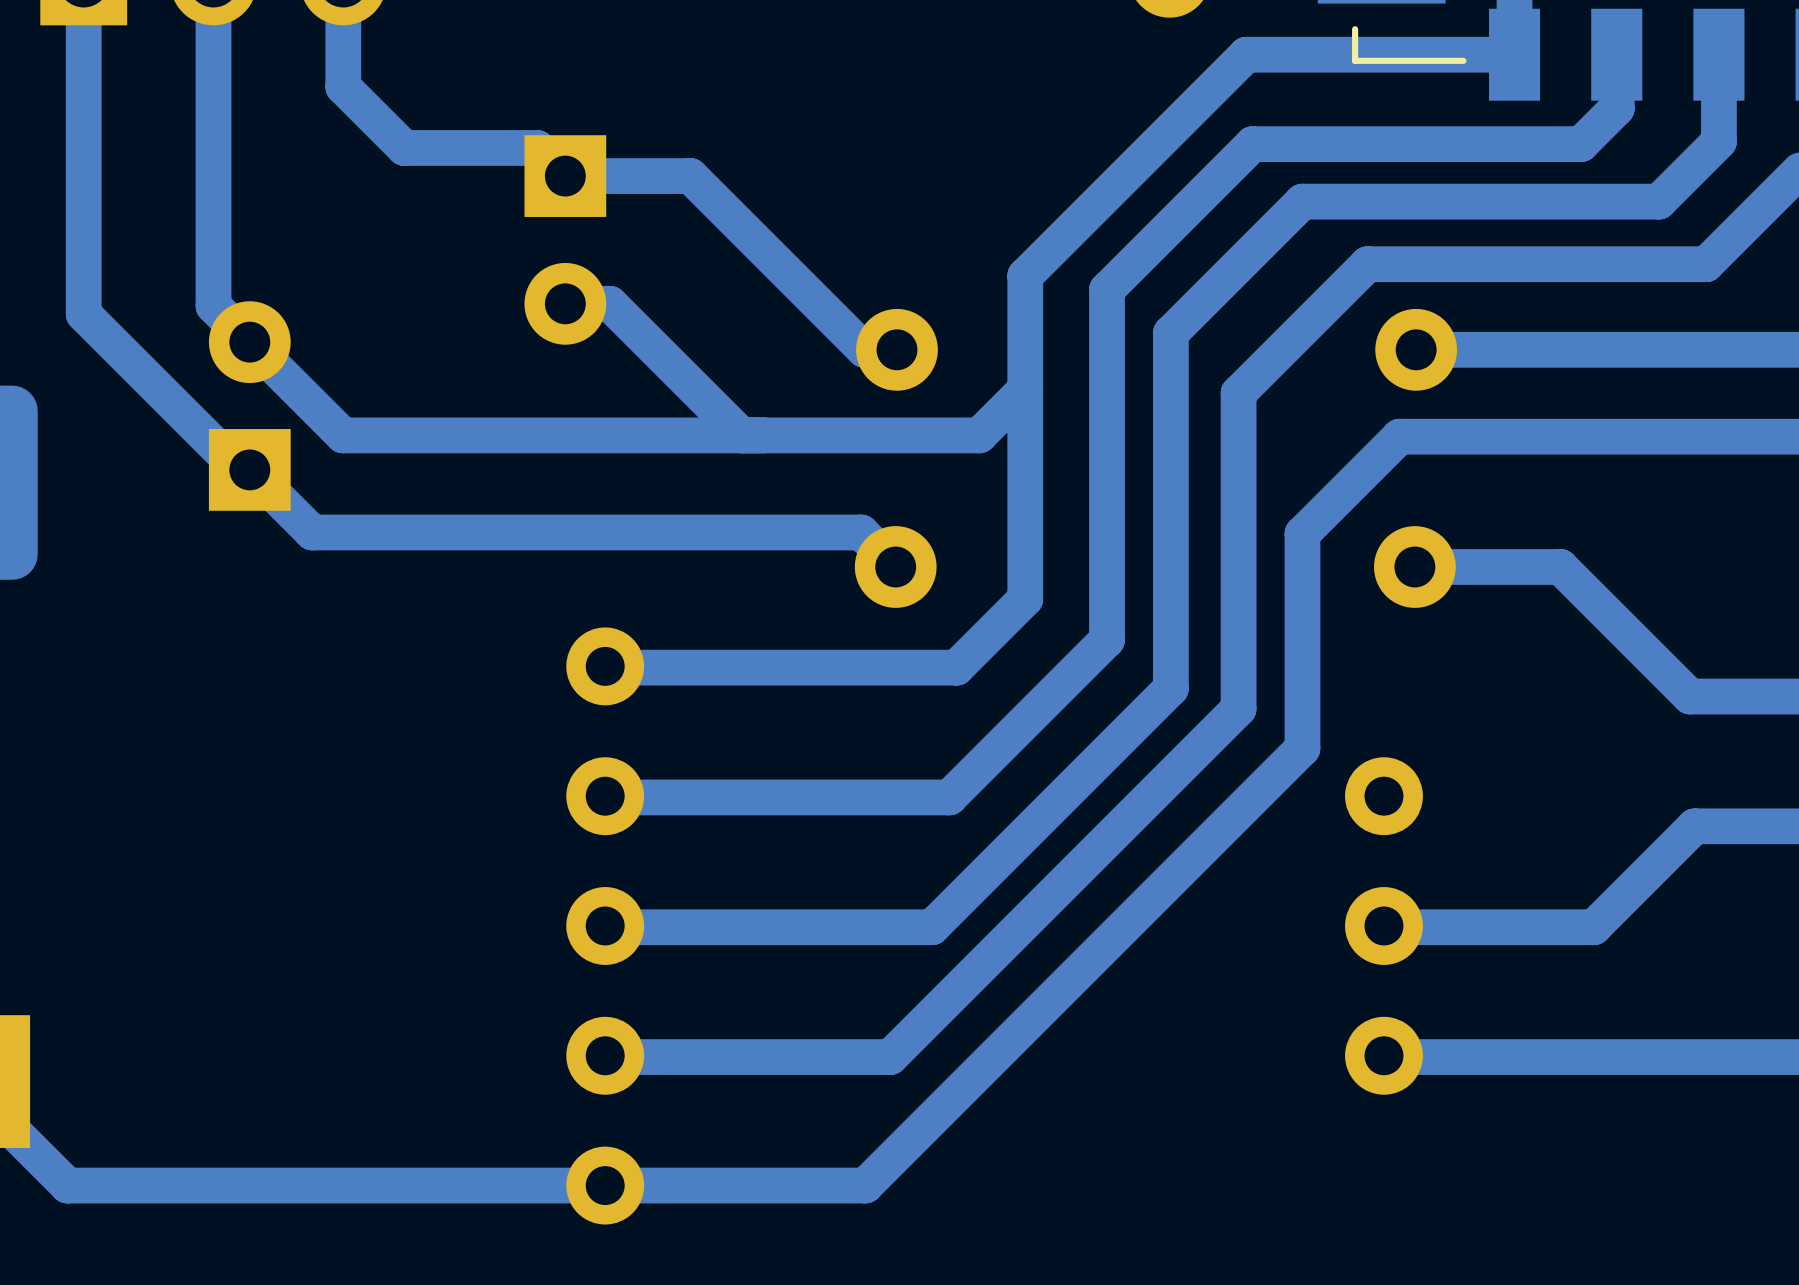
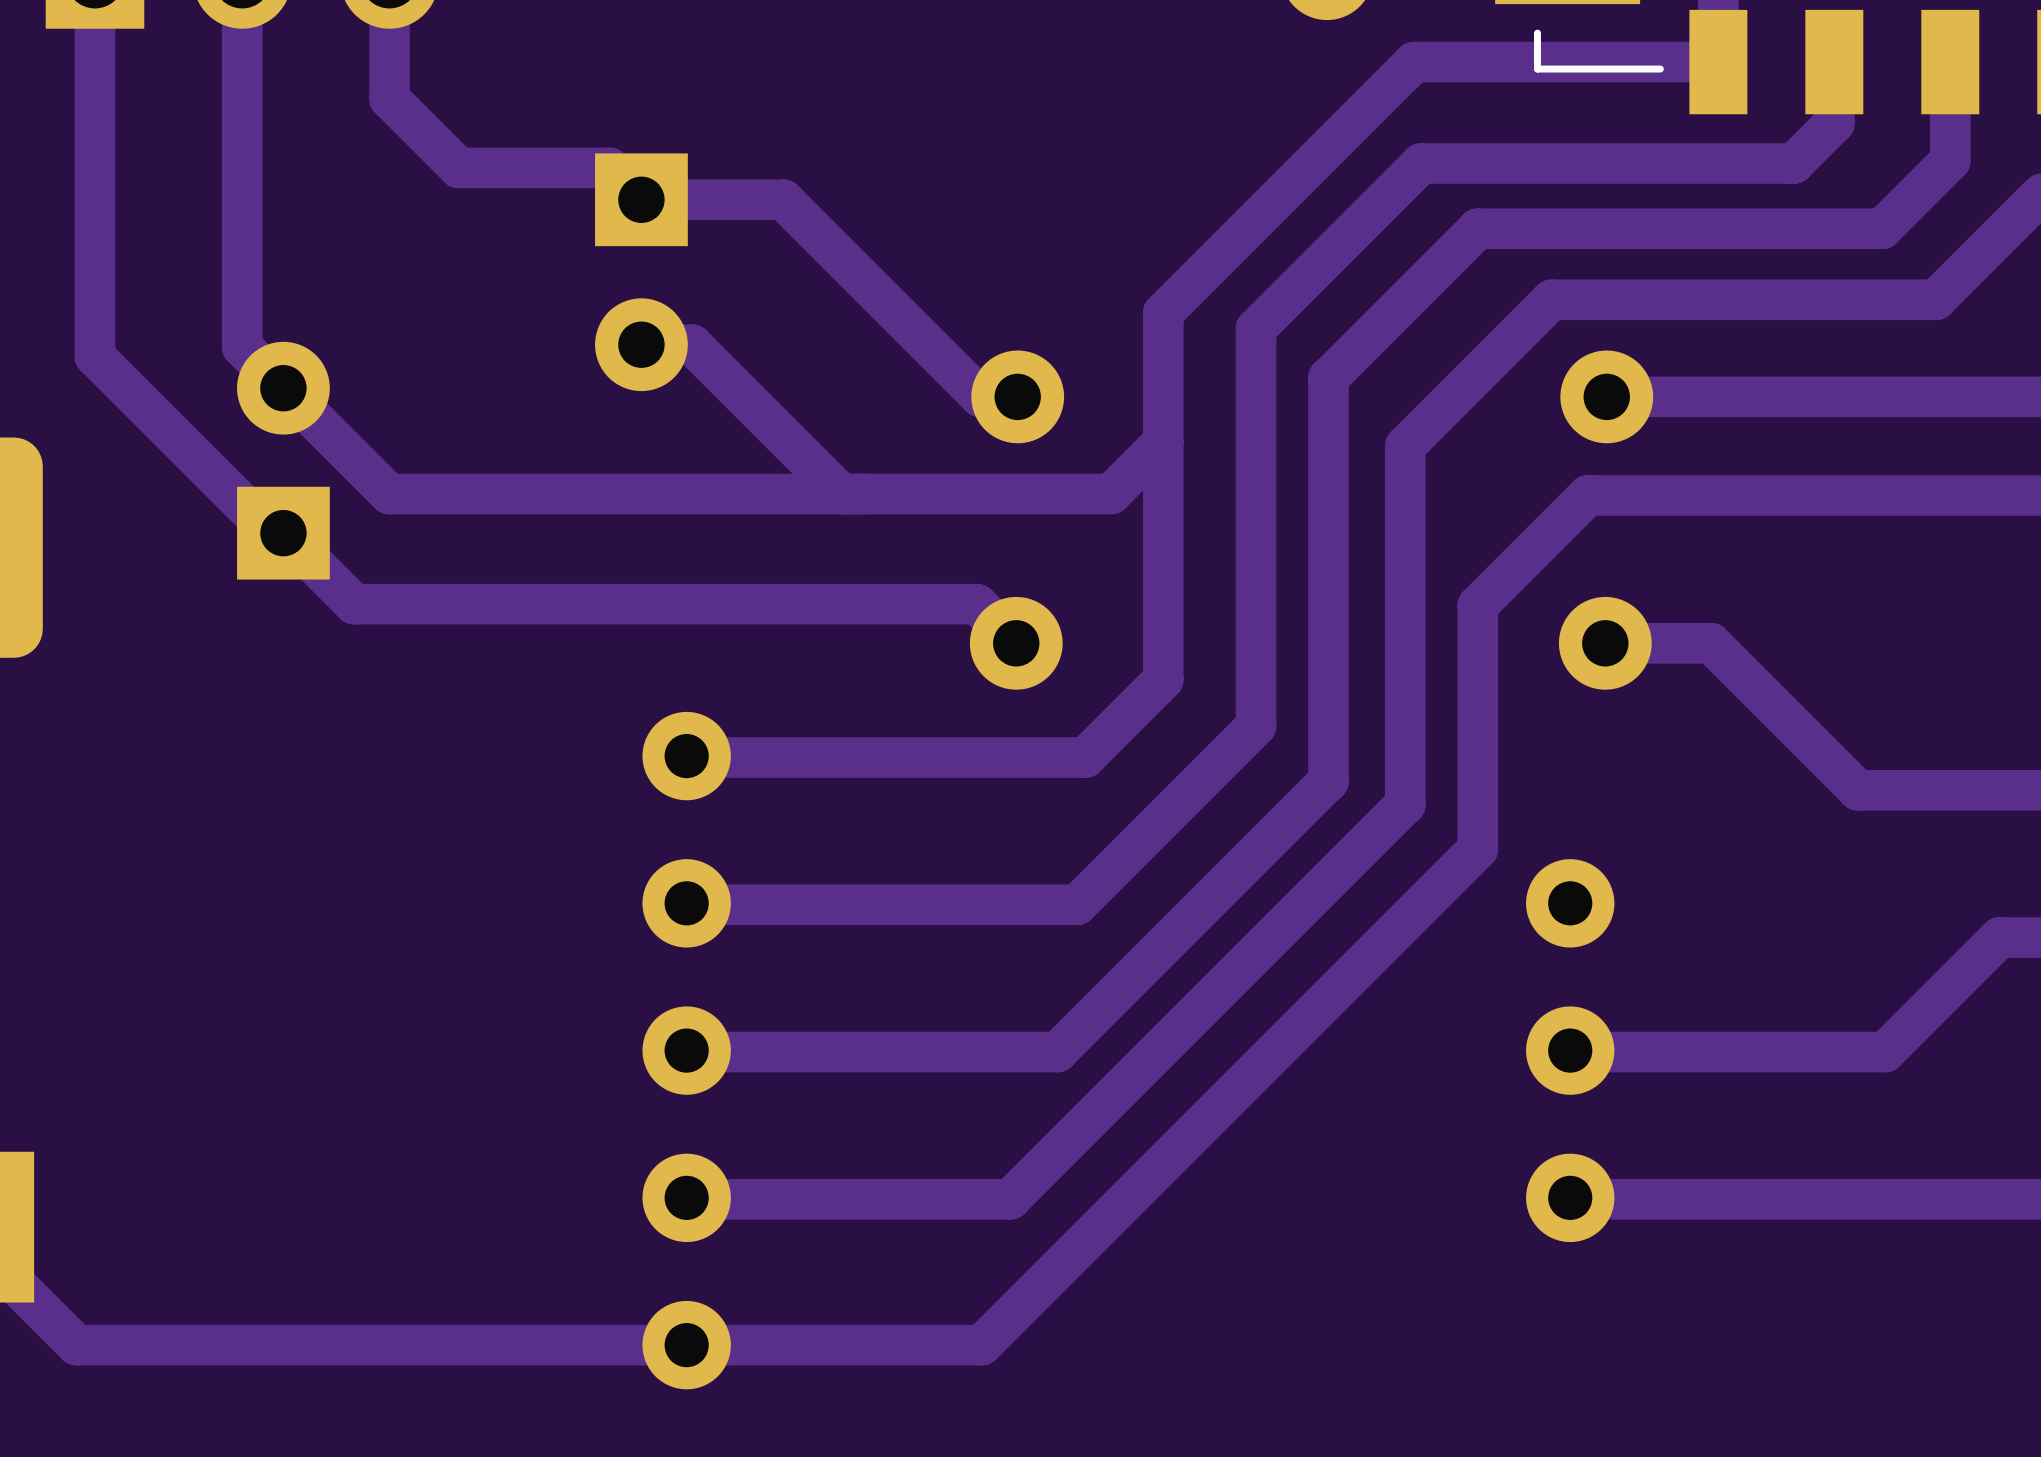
track: (1508, 566) (1560, 566) (1690, 696) -> (1711, 643) (1858, 790) (1917, 790)
track: (1762, 826) (1694, 826) (1593, 927) -> (1999, 937) (1885, 1052) (1808, 1052)

